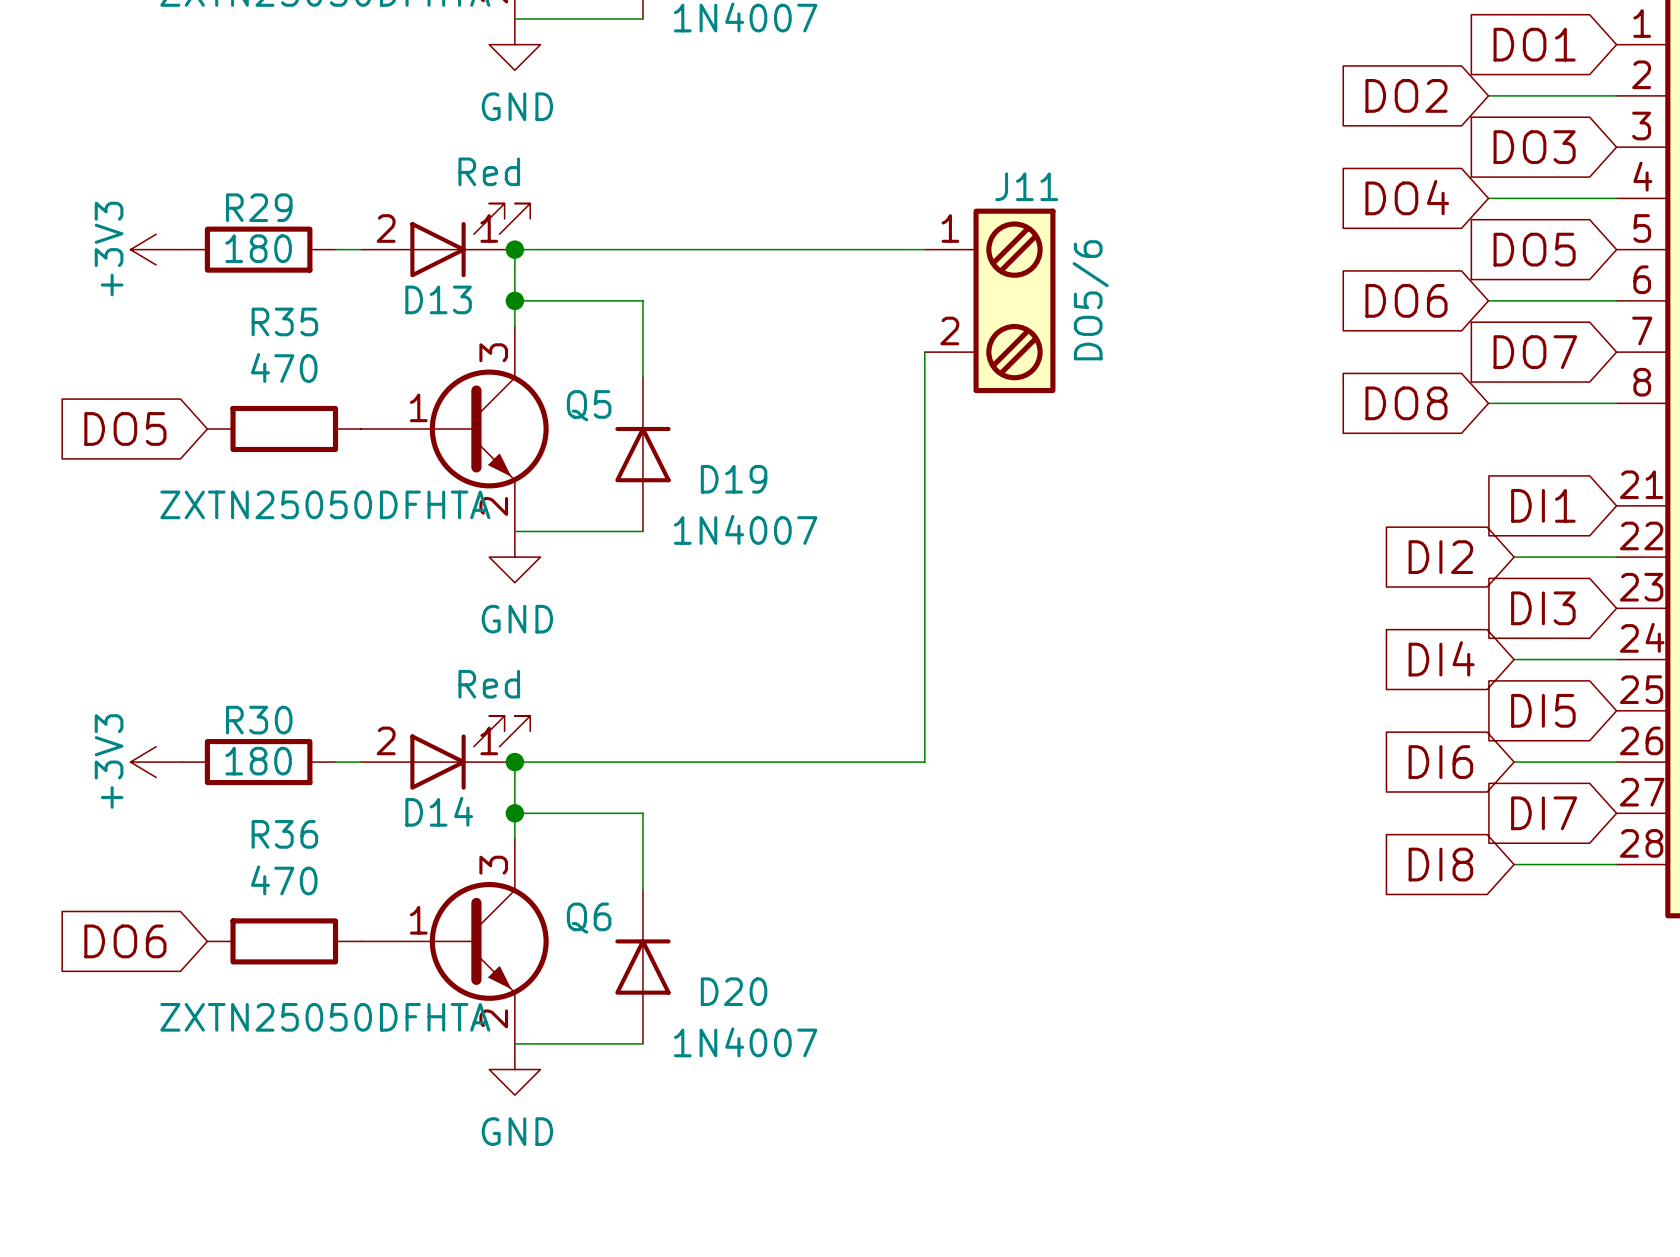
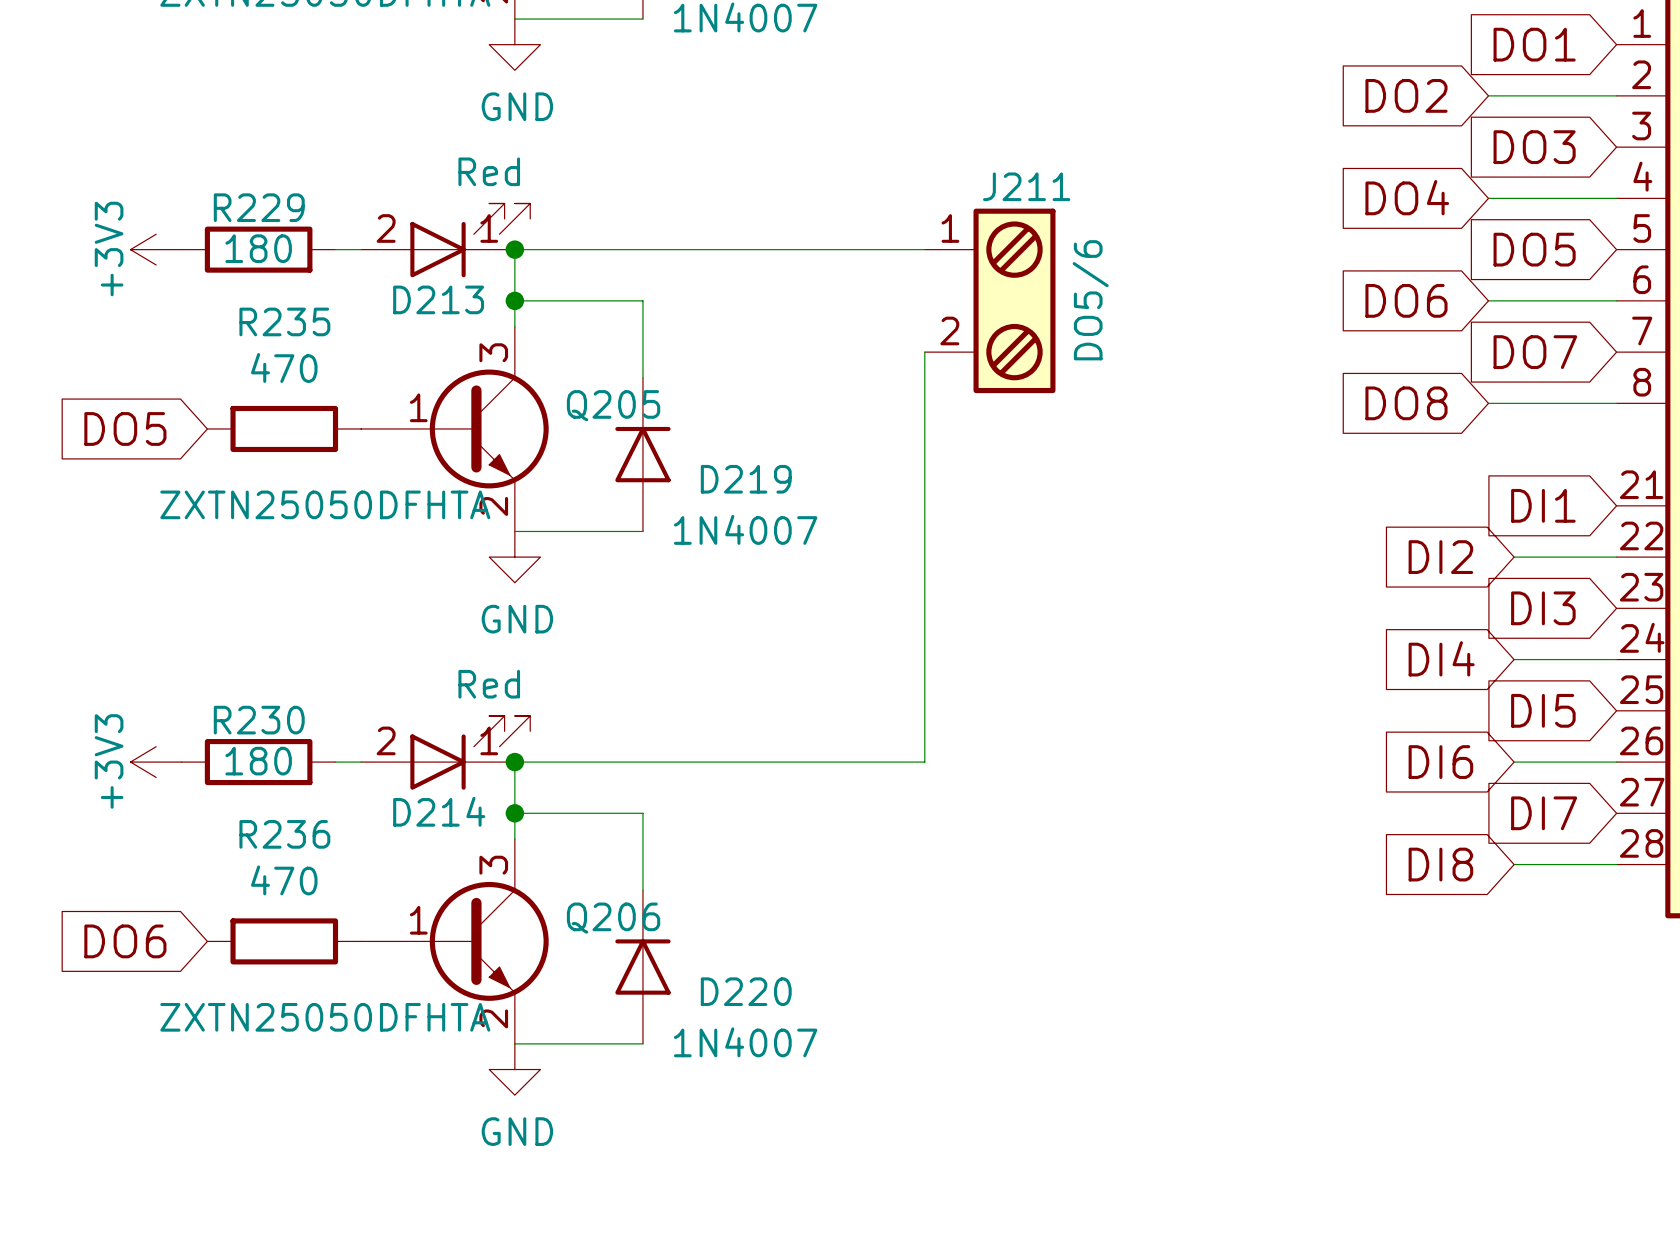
J11 name: J11 (1026, 186) -> J211 (1026, 186)
R29 name: R29 (259, 207) -> R229 (259, 207)
D13 name: D13 (438, 299) -> D213 (438, 299)
R35 name: R35 (284, 321) -> R235 (284, 321)
Q5 name: Q5 (589, 405) -> Q205 (613, 405)
D19 name: D19 (734, 479) -> D219 (746, 479)
R30 name: R30 (259, 720) -> R230 (259, 720)
D14 name: D14 (439, 811) -> D214 (439, 811)
R36 name: R36 (284, 834) -> R236 (284, 834)
Q6 name: Q6 (589, 918) -> Q206 (613, 918)
D20 name: D20 (734, 991) -> D220 (746, 991)

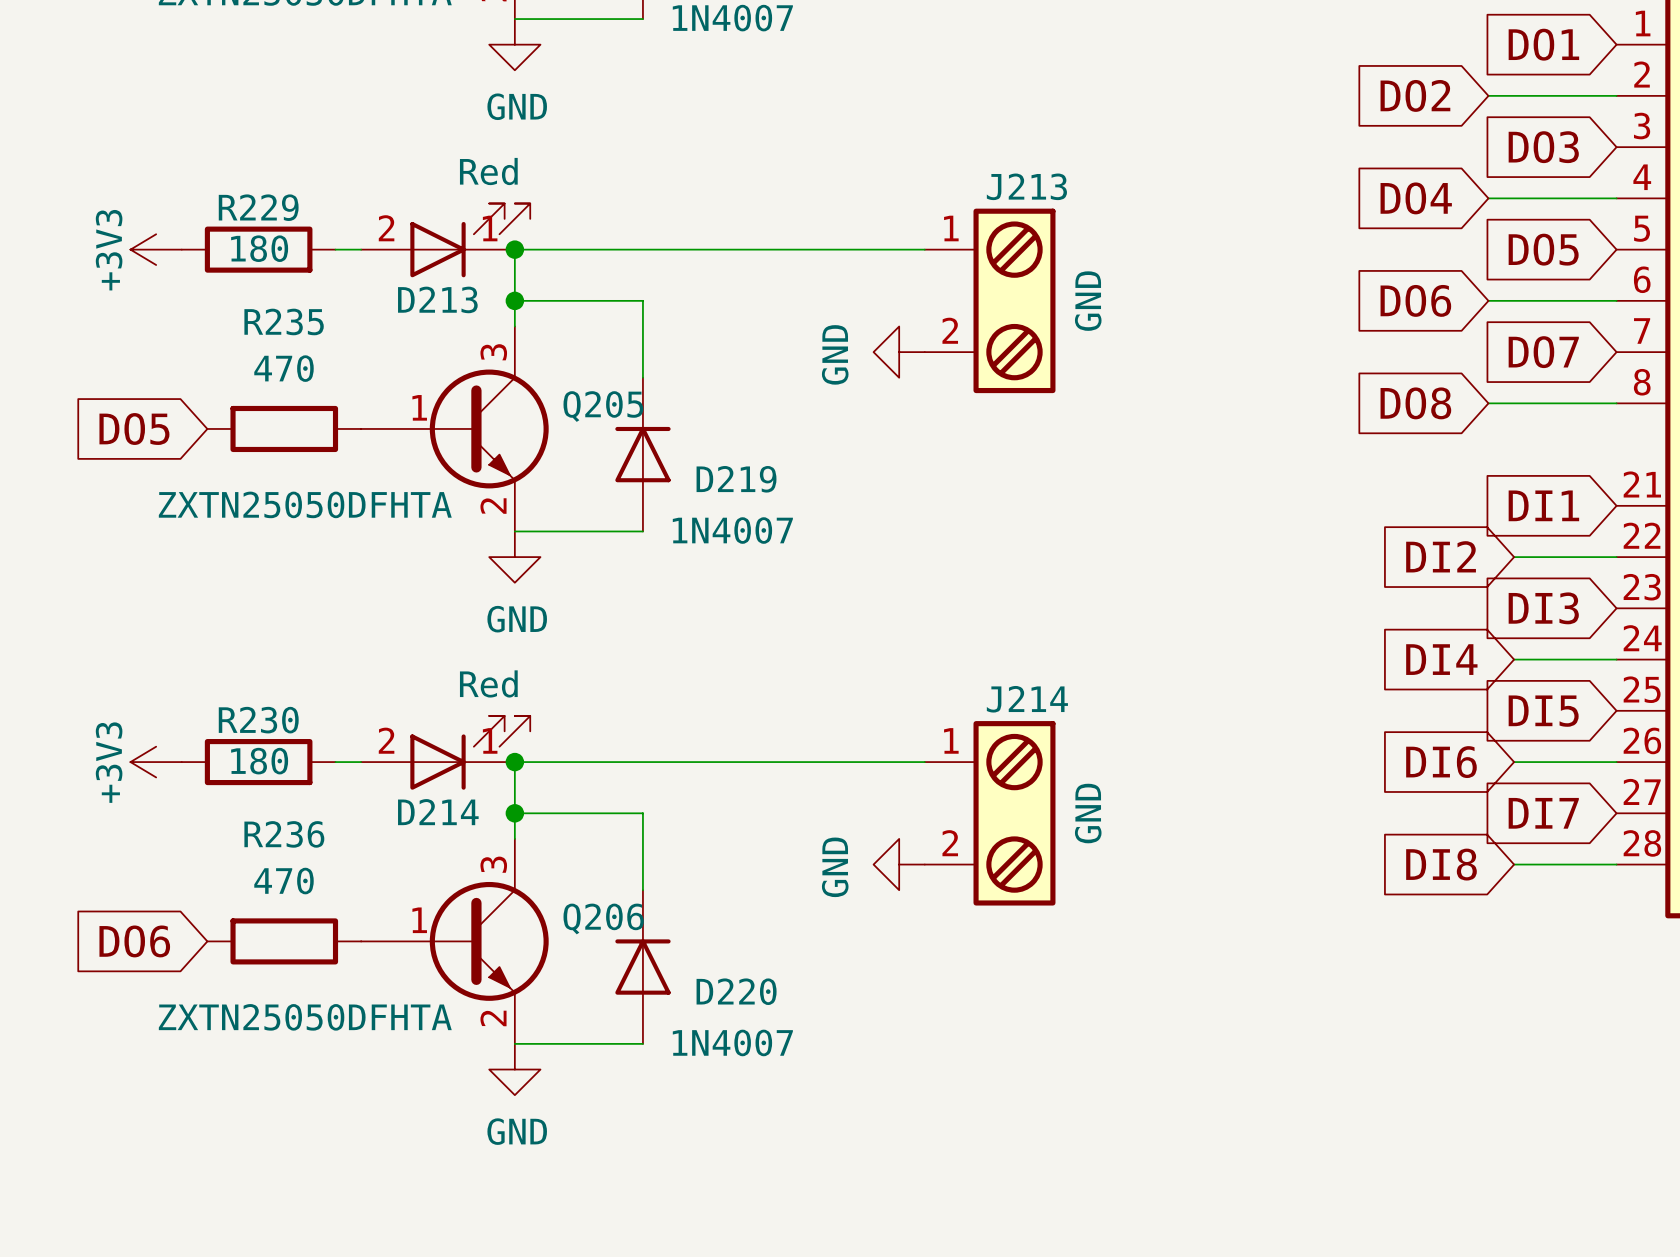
J211 name: J211 (1026, 186) -> J213 (1026, 186)
J211 value: DO5/6 (1090, 300) -> GND (1088, 301)
power symbol: none -> GND (899, 352)
wire: (924, 352) (924, 762) -> none
J214: none -> GND (990, 813)
power symbol: none -> GND (899, 864)

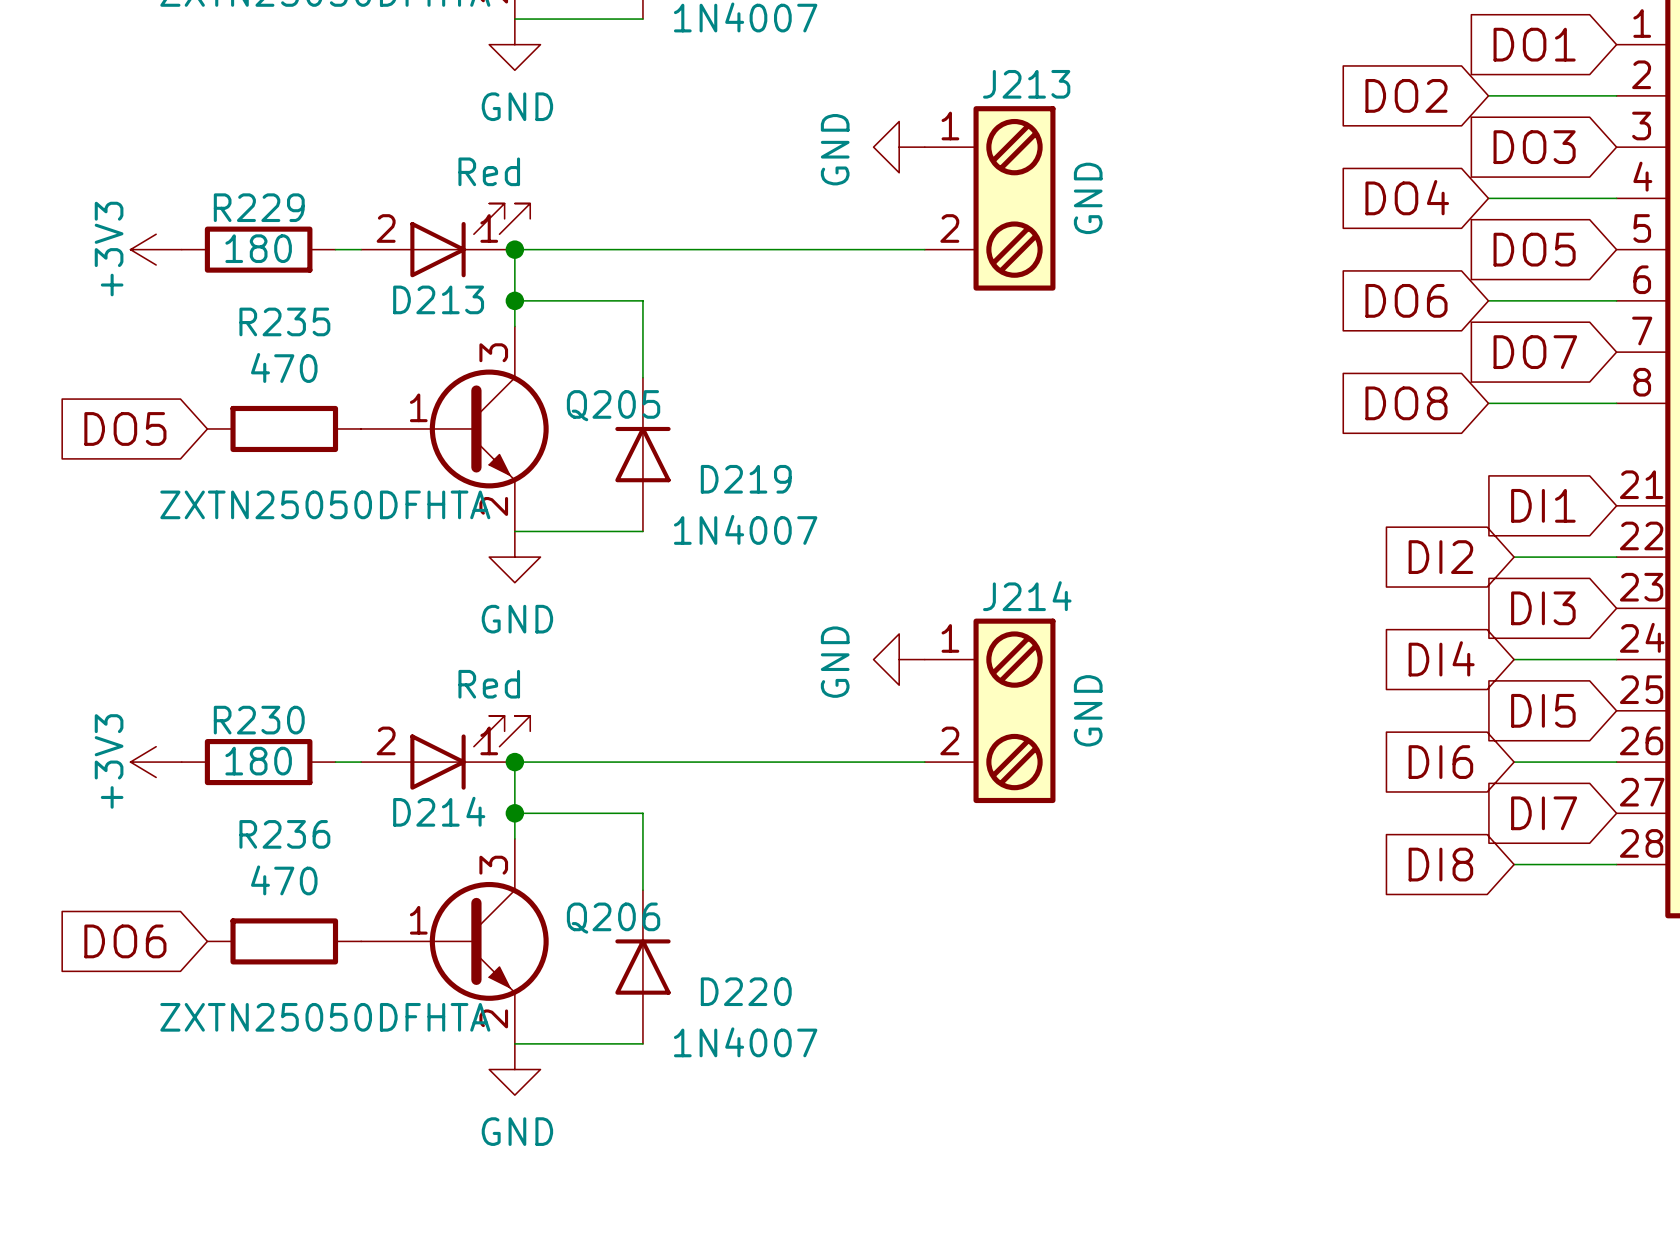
power symbol: none -> GND (899, 147)
J213 position: (990, 300) -> (990, 198)
power symbol: GND (899, 352) -> none
power symbol: none -> GND (899, 659)
J214 position: (990, 813) -> (990, 710)
power symbol: GND (899, 864) -> none

